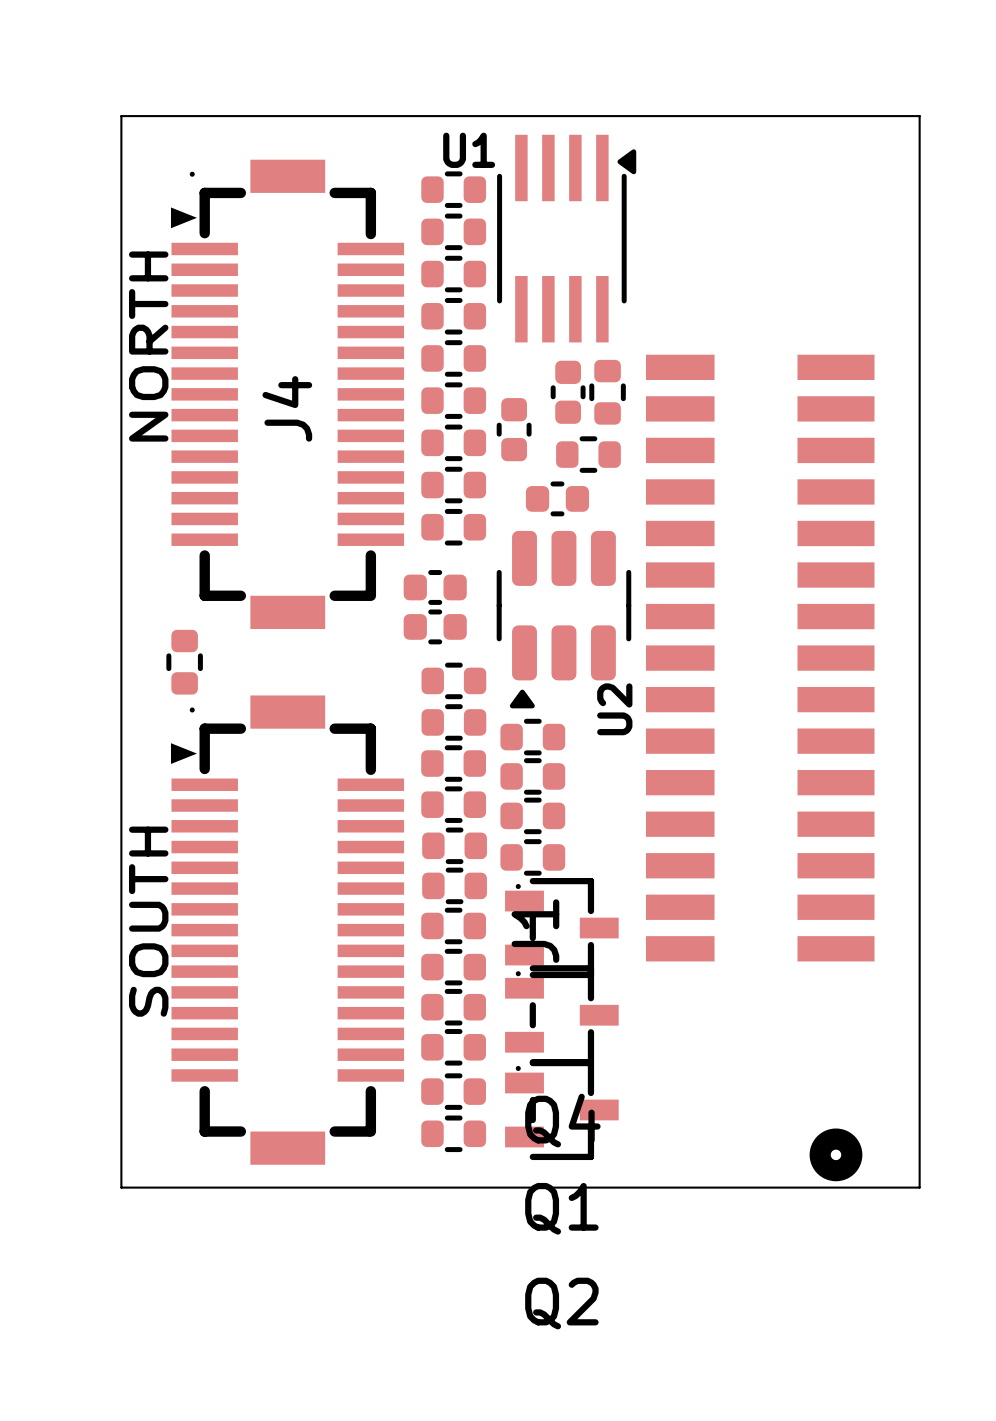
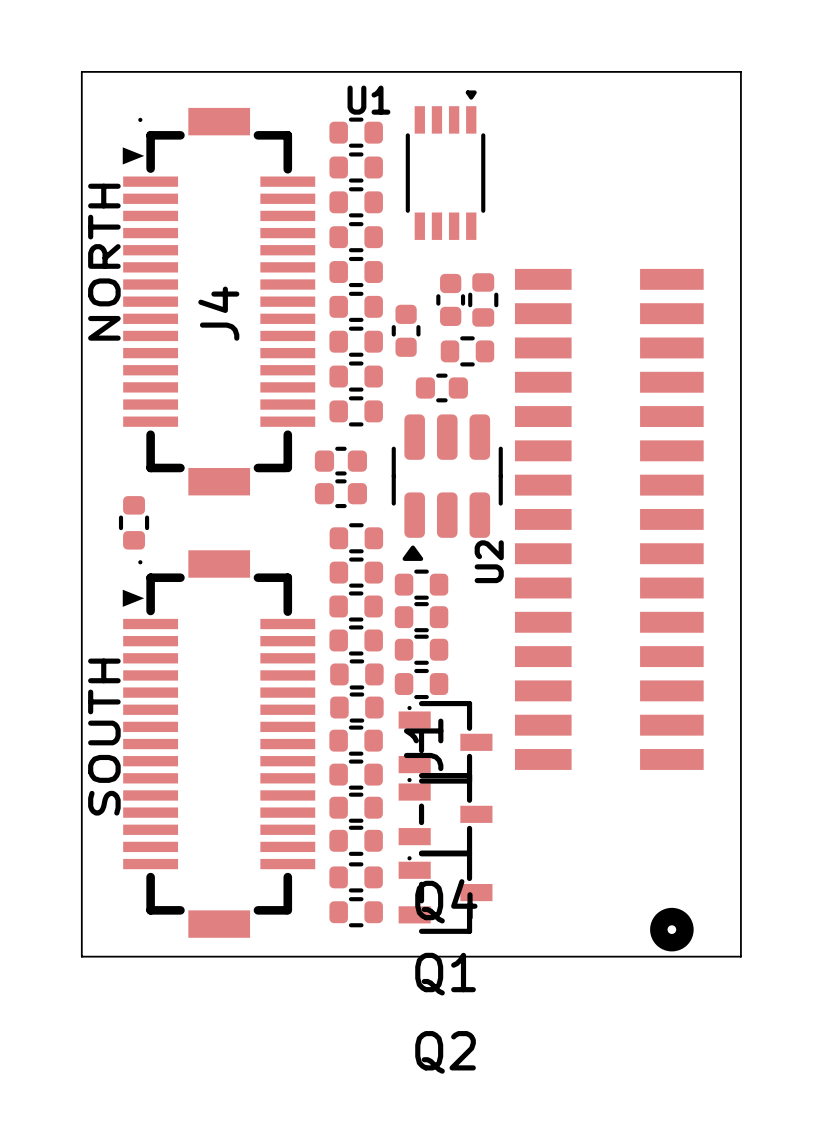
U1 footprint: [497, 134, 637, 343] -> [405, 90, 486, 240]

